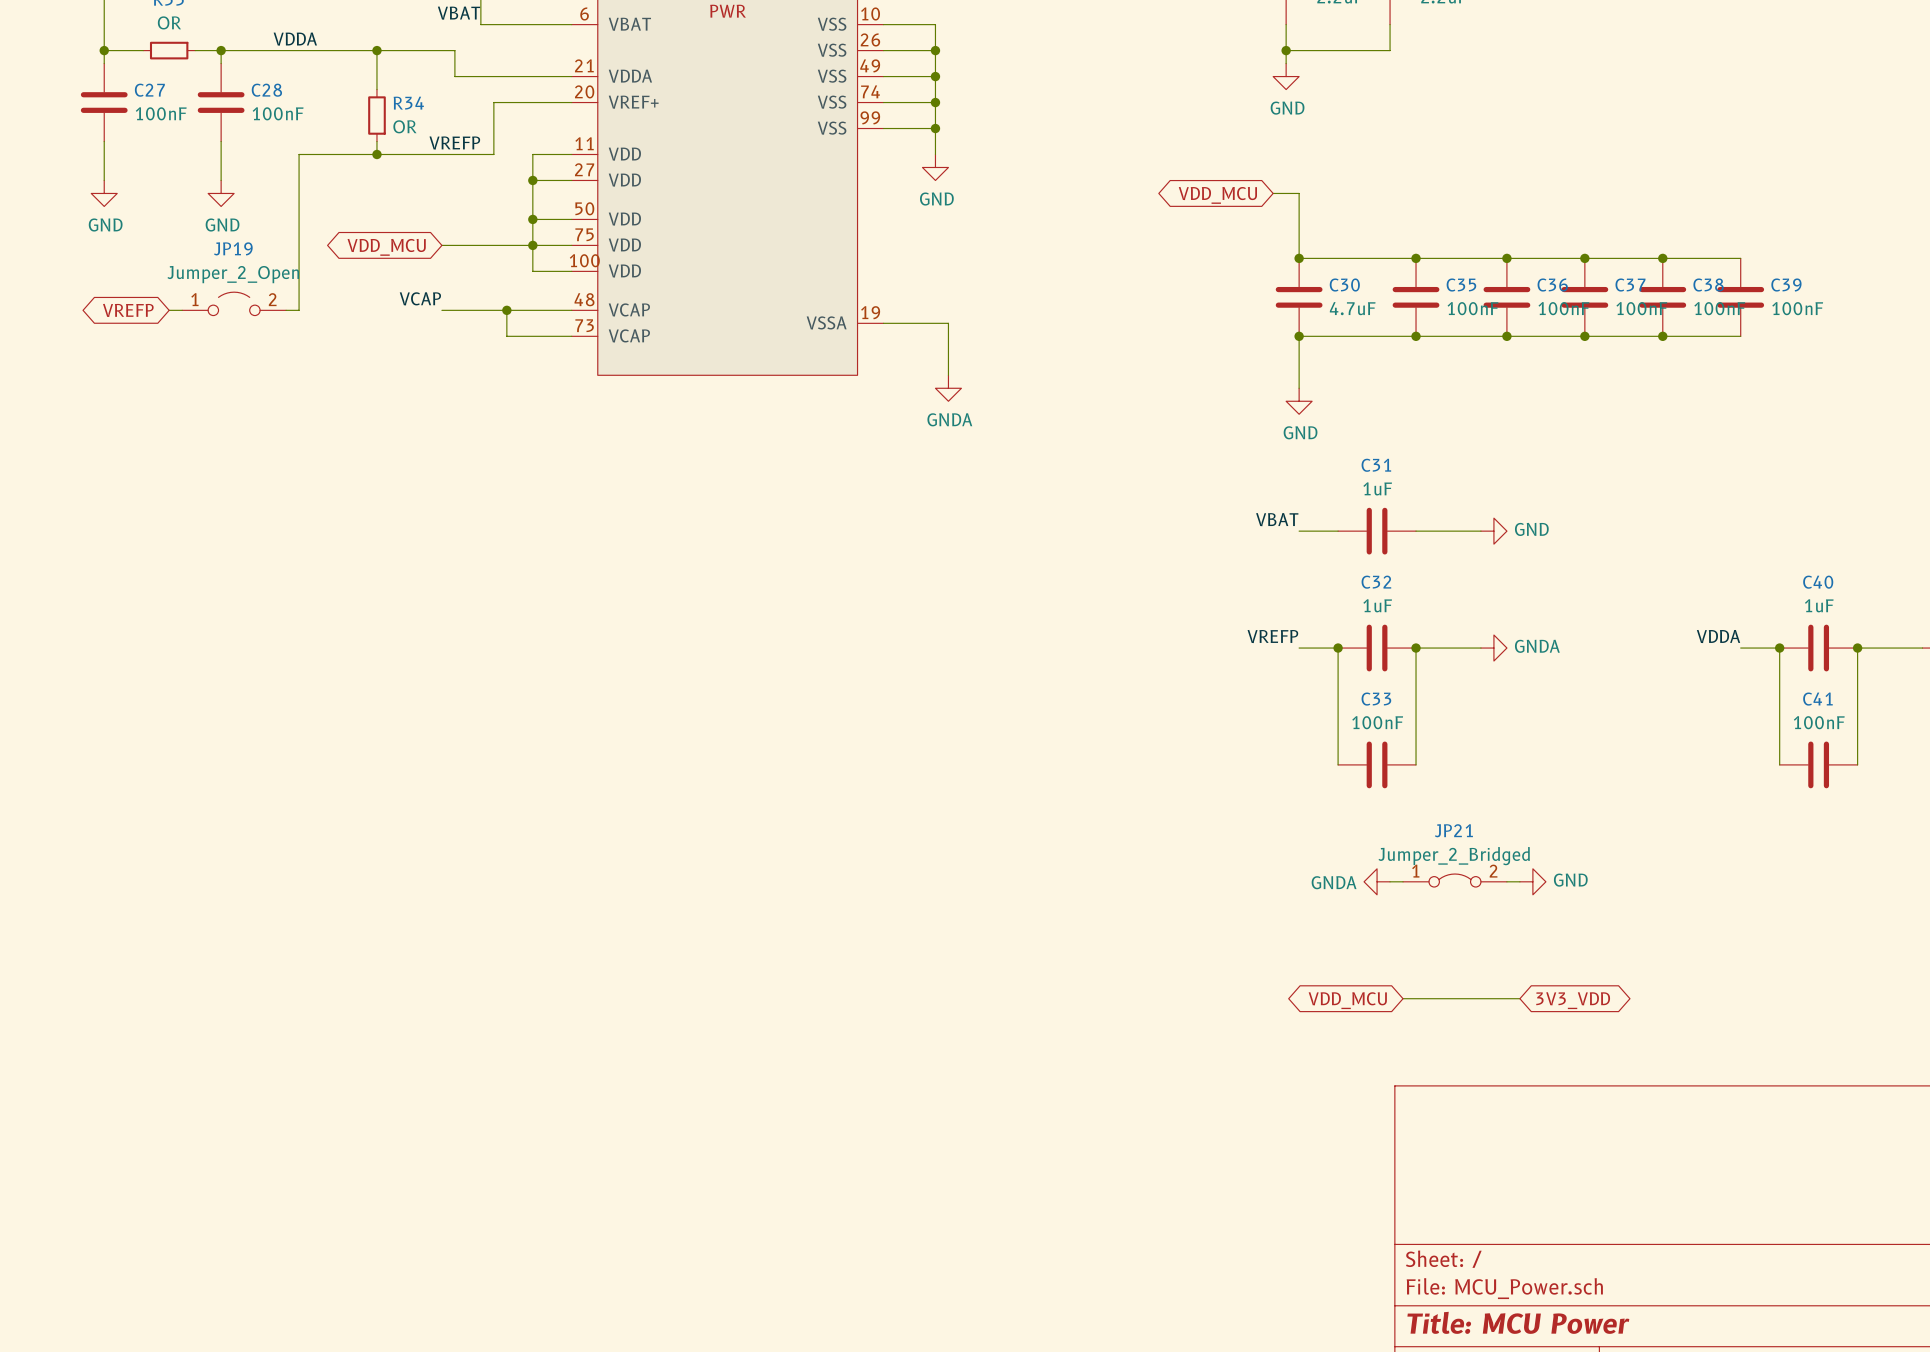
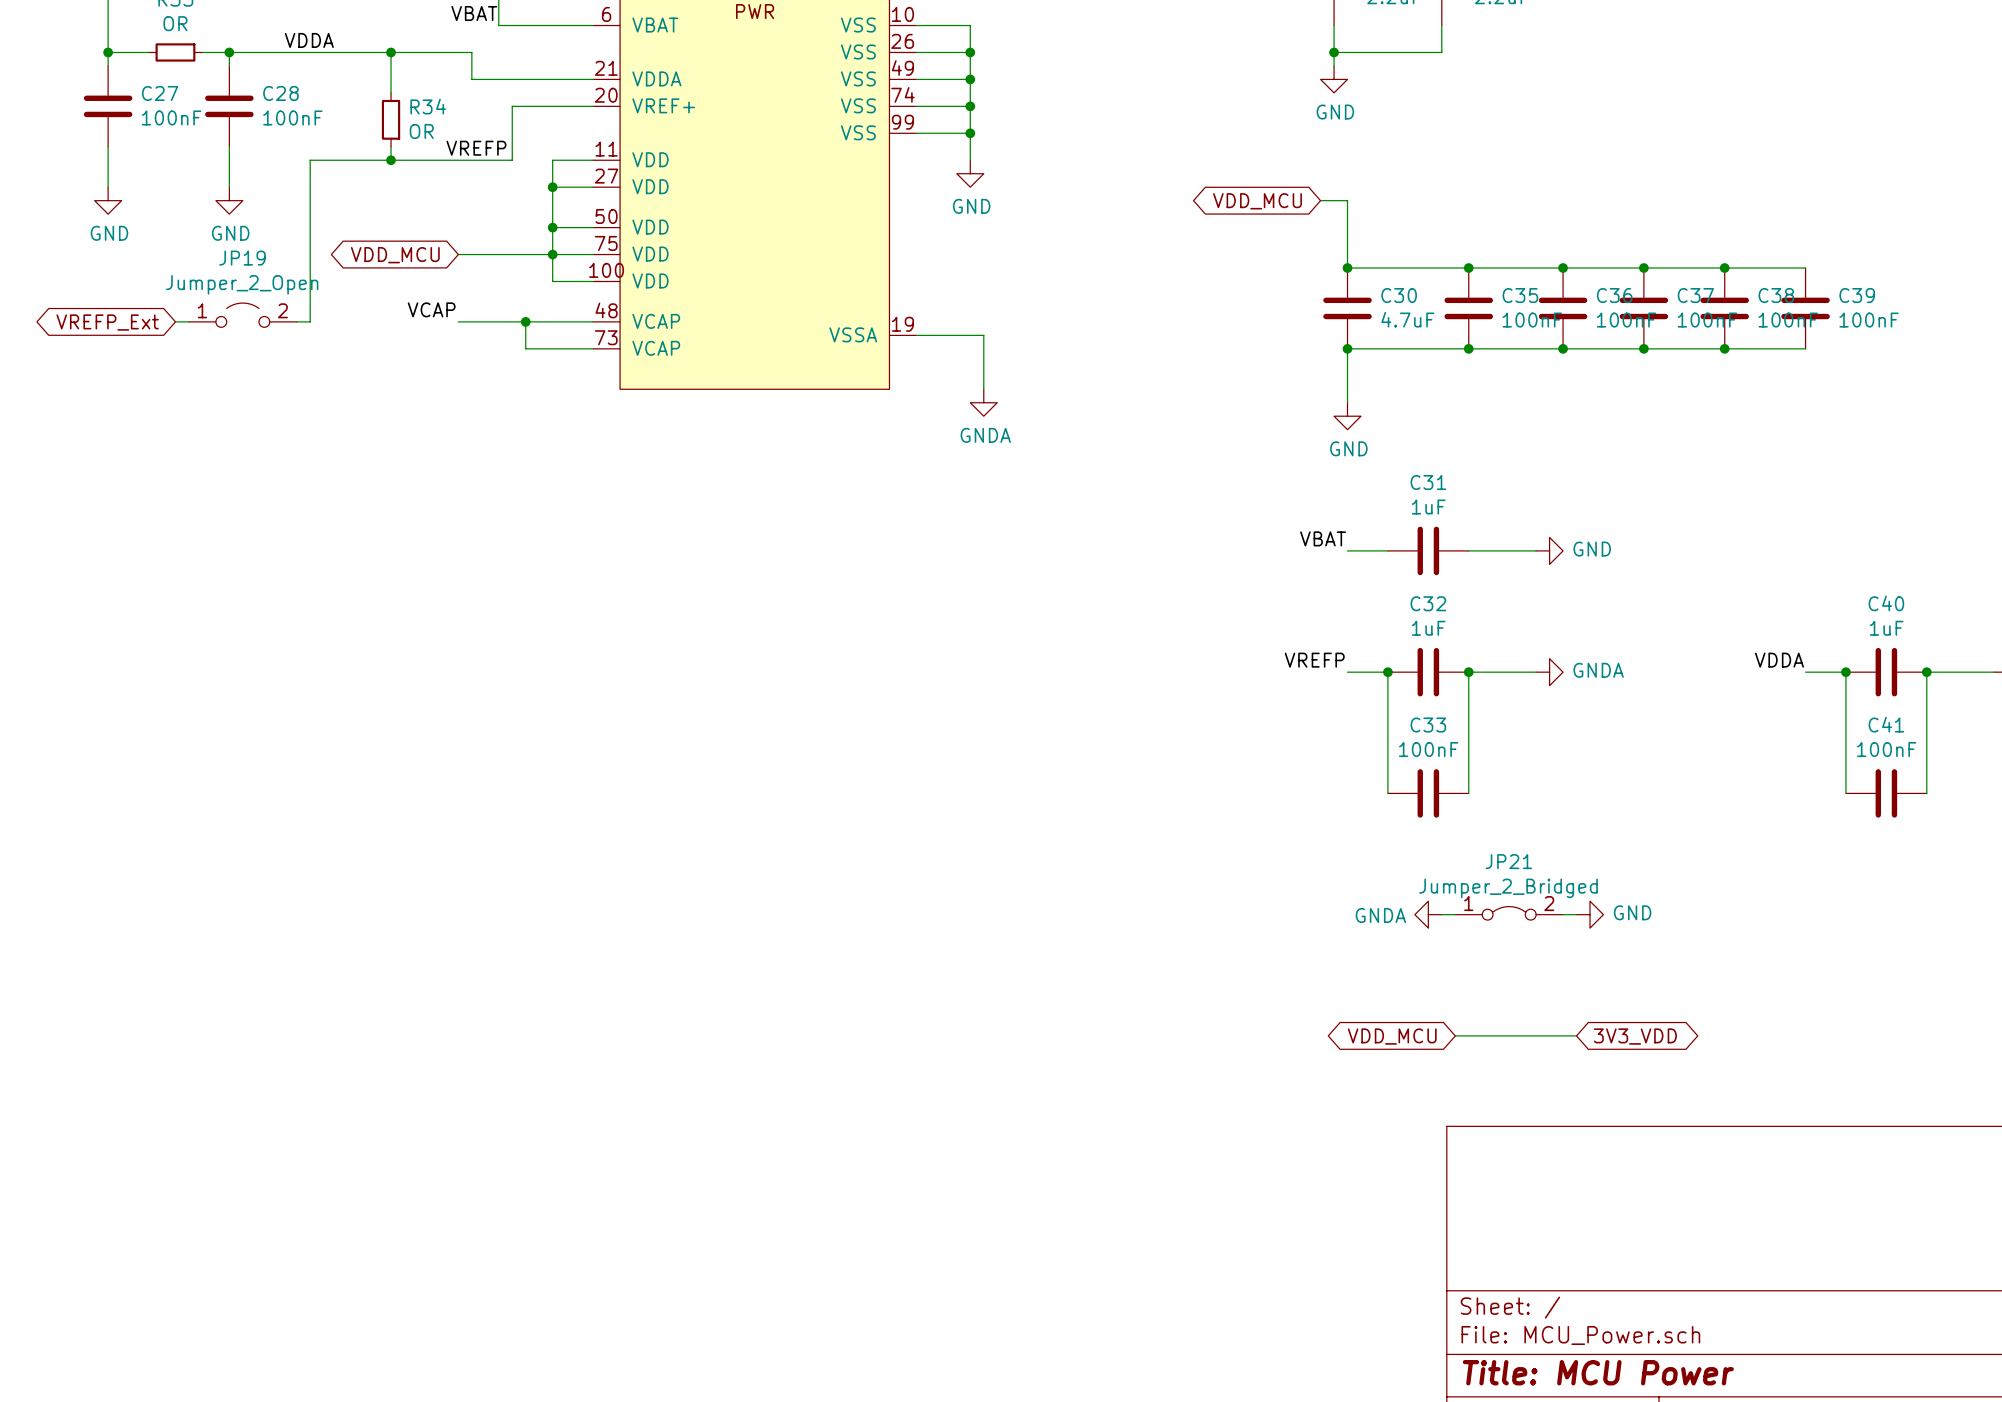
global label: VREFP (128, 310) -> VREFP_Ext (107, 322)

